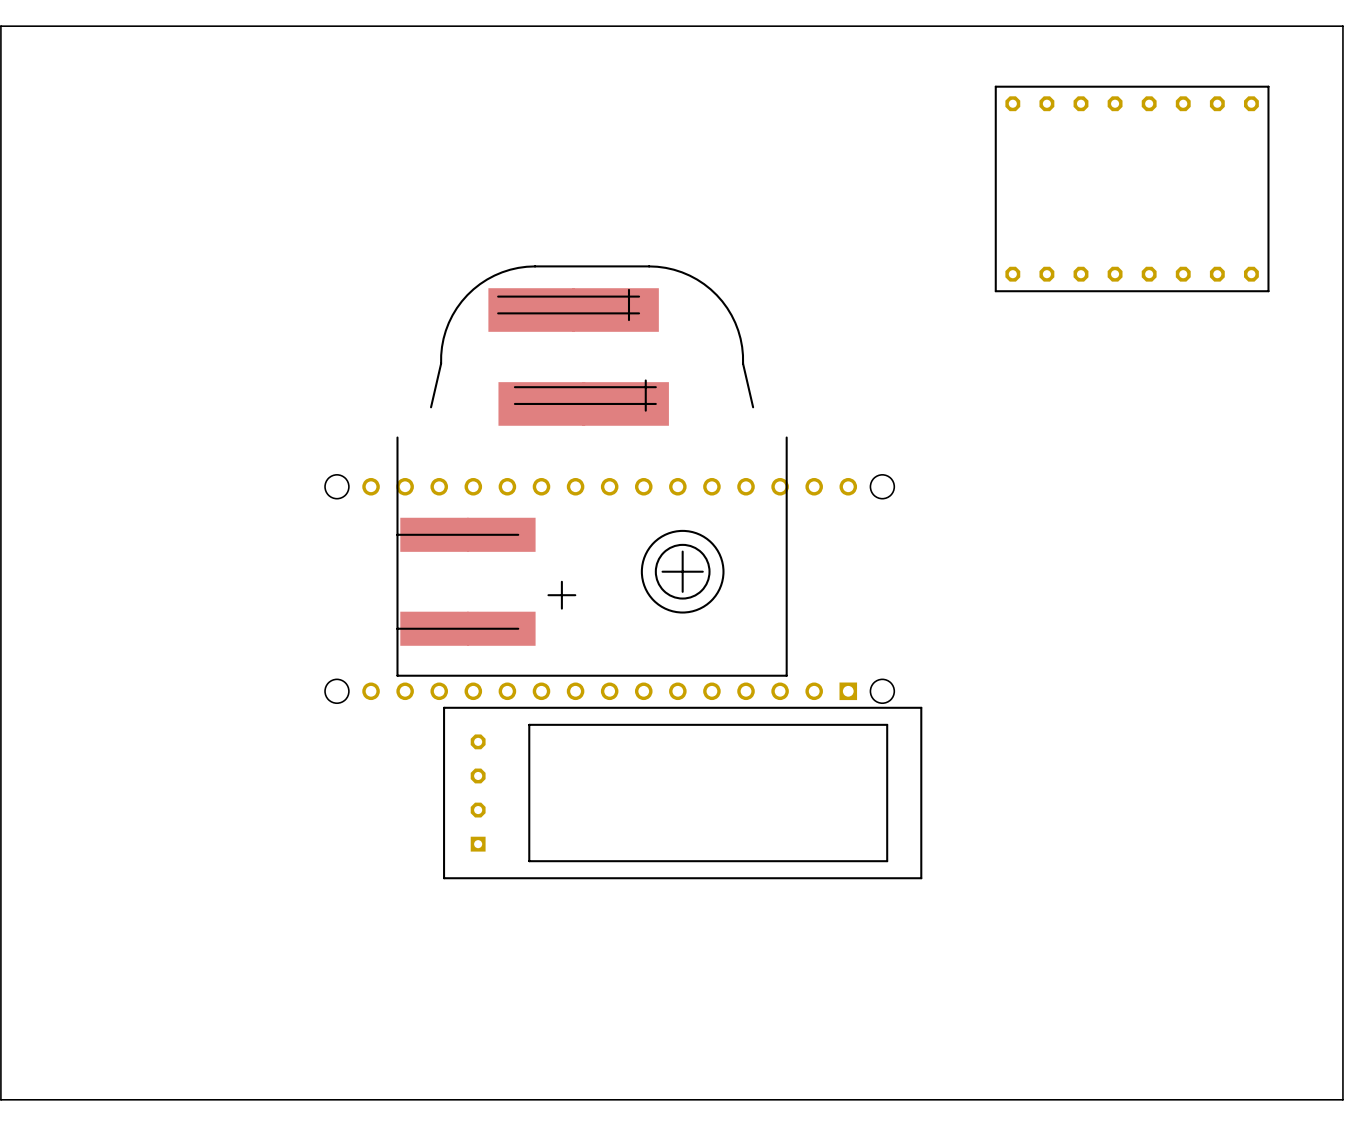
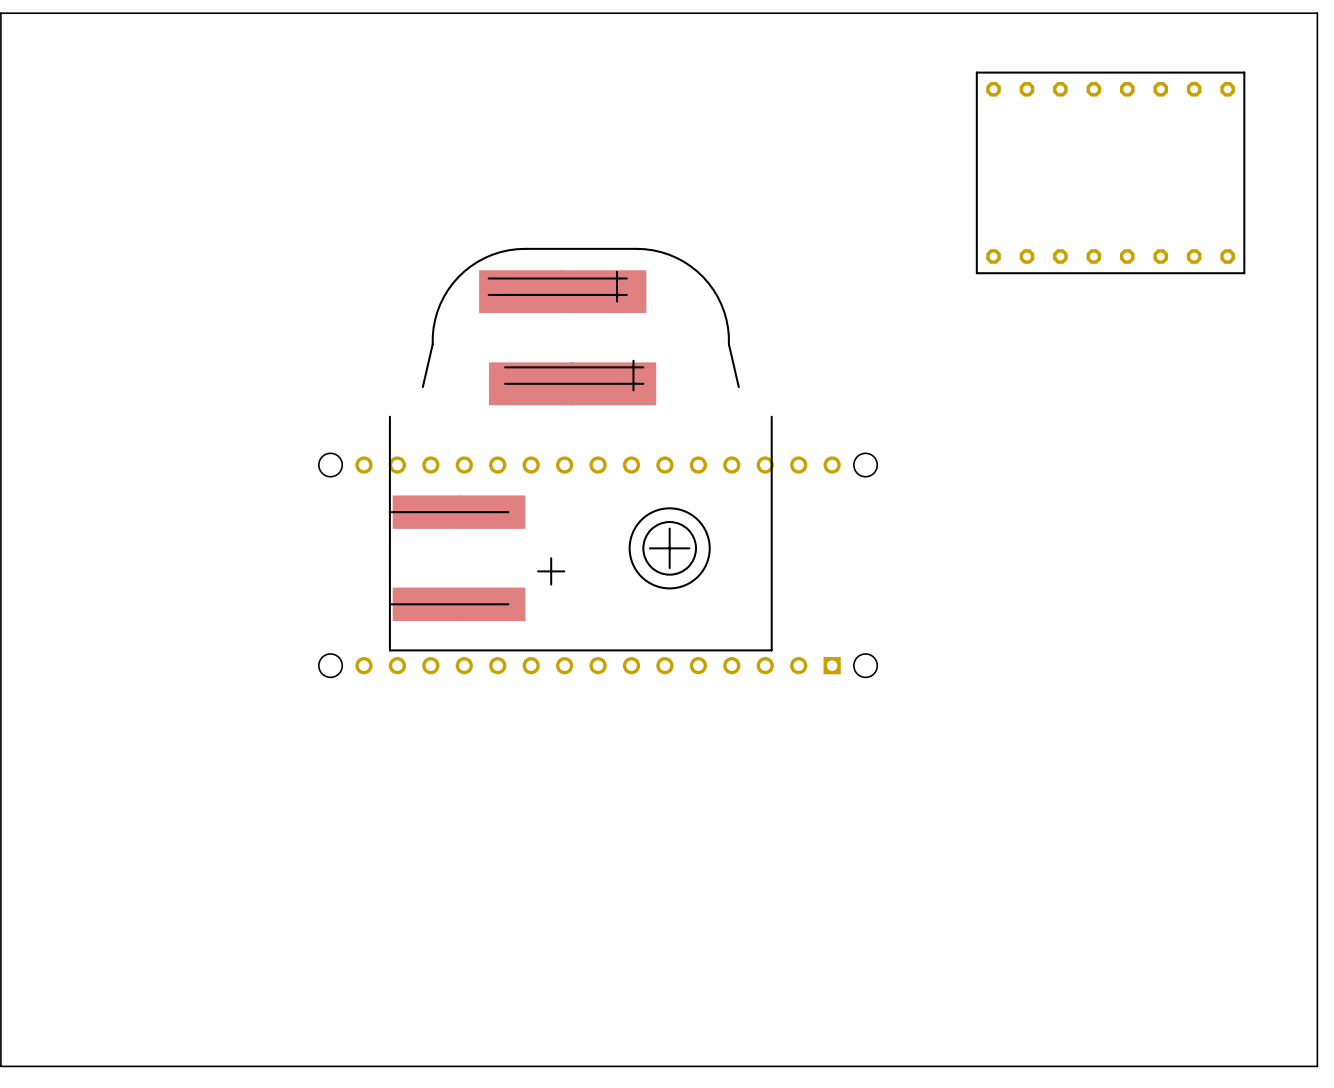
part: (682, 793) -> none

